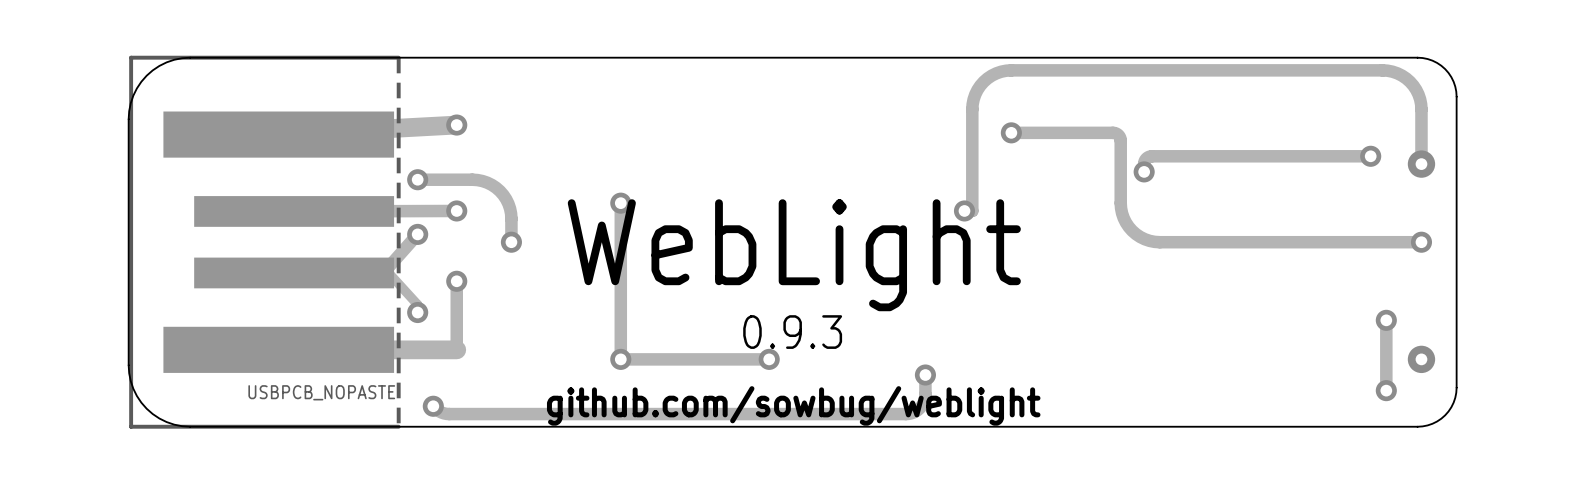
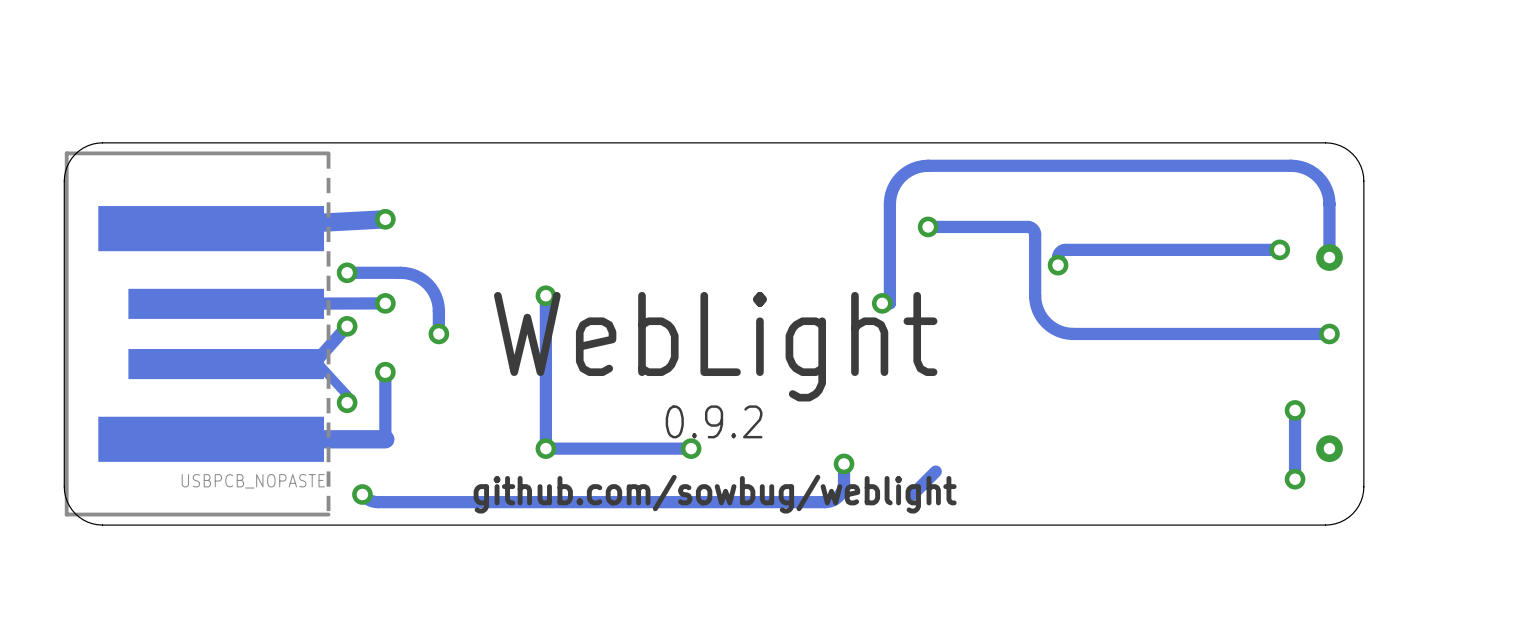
board edge: (1456, 96) (1453, 81) (1445, 69) (1432, 60) (1417, 57) (190, 57) (166, 62) (146, 75) (133, 95) (128, 119) -> (1363, 191) (1362, 171) (1355, 157) (1344, 147) (1325, 142) (102, 142) (83, 147) (69, 161) (64, 176) (64, 213)
text: 0.9.3 (792, 332) -> 0.9.2 (714, 421)
board edge: (128, 365) (133, 388) (146, 408) (166, 422) (190, 426) (1417, 426) (1432, 423) (1445, 415) (1453, 402) (1456, 387) -> (64, 454) (64, 491) (69, 505) (83, 519) (102, 525) (1325, 525) (1344, 519) (1355, 510) (1362, 496) (1363, 476)
track: none -> (935, 471) (912, 494)

